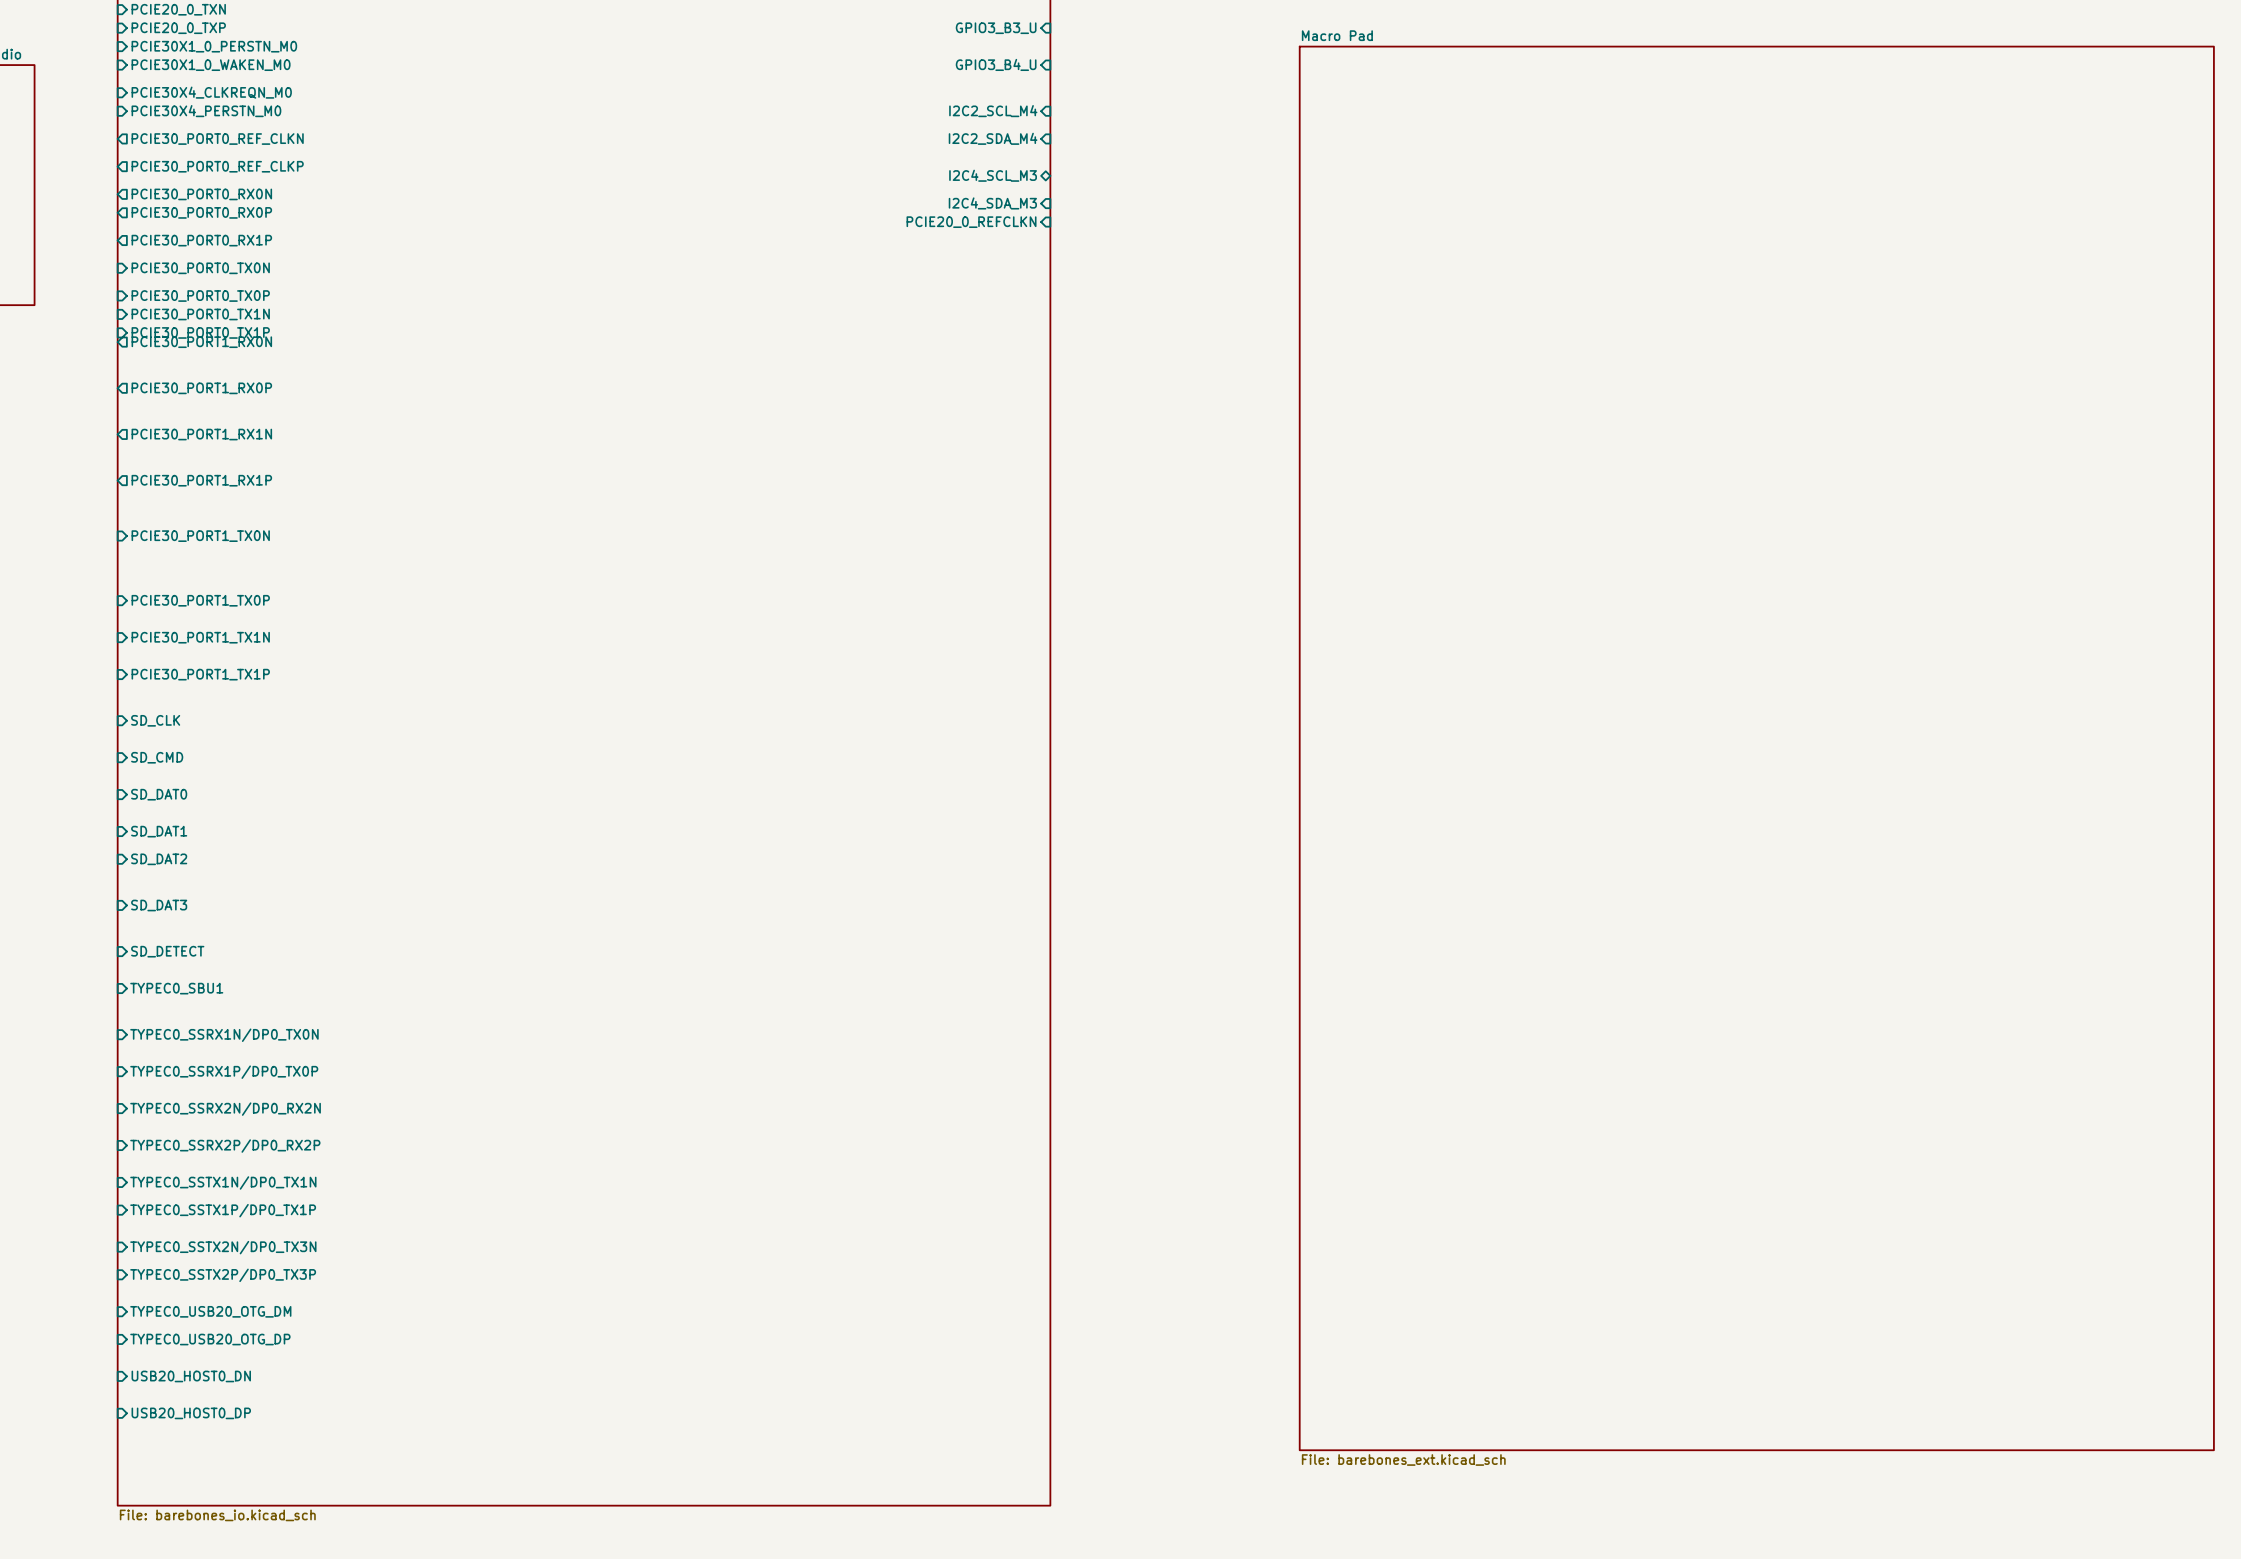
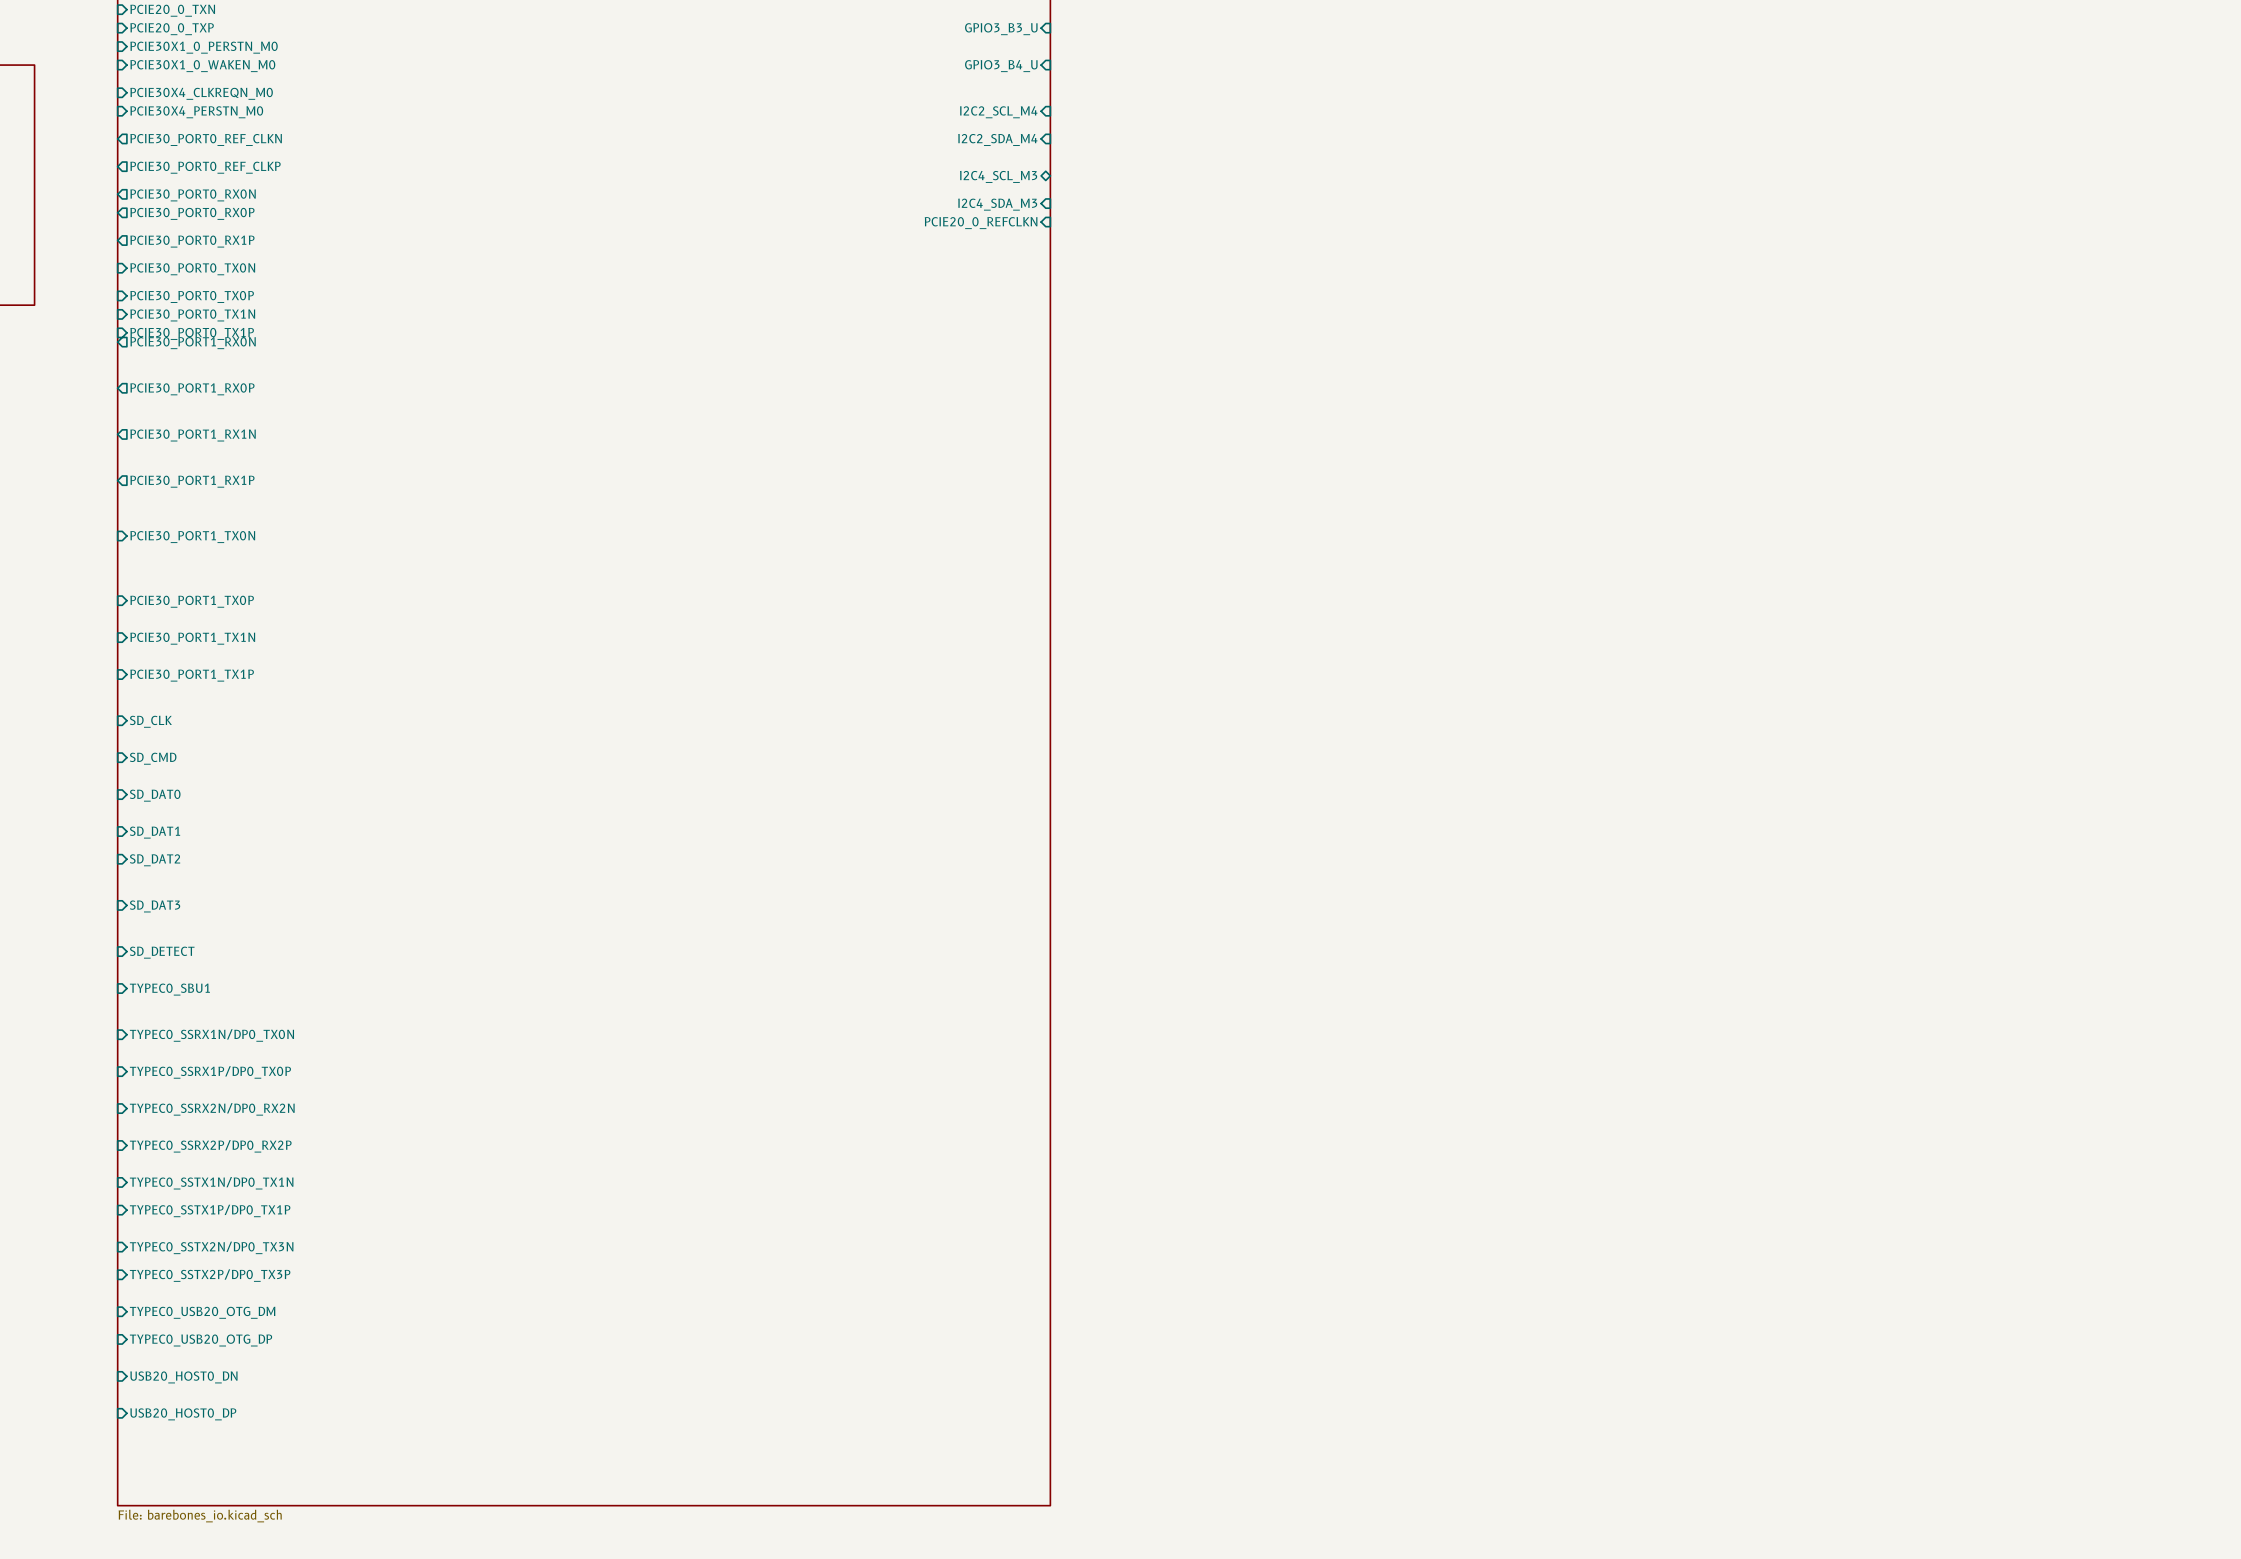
sheet Macro Pad: File: barebones_ext.kicad_sch (1756, 748) -> none

